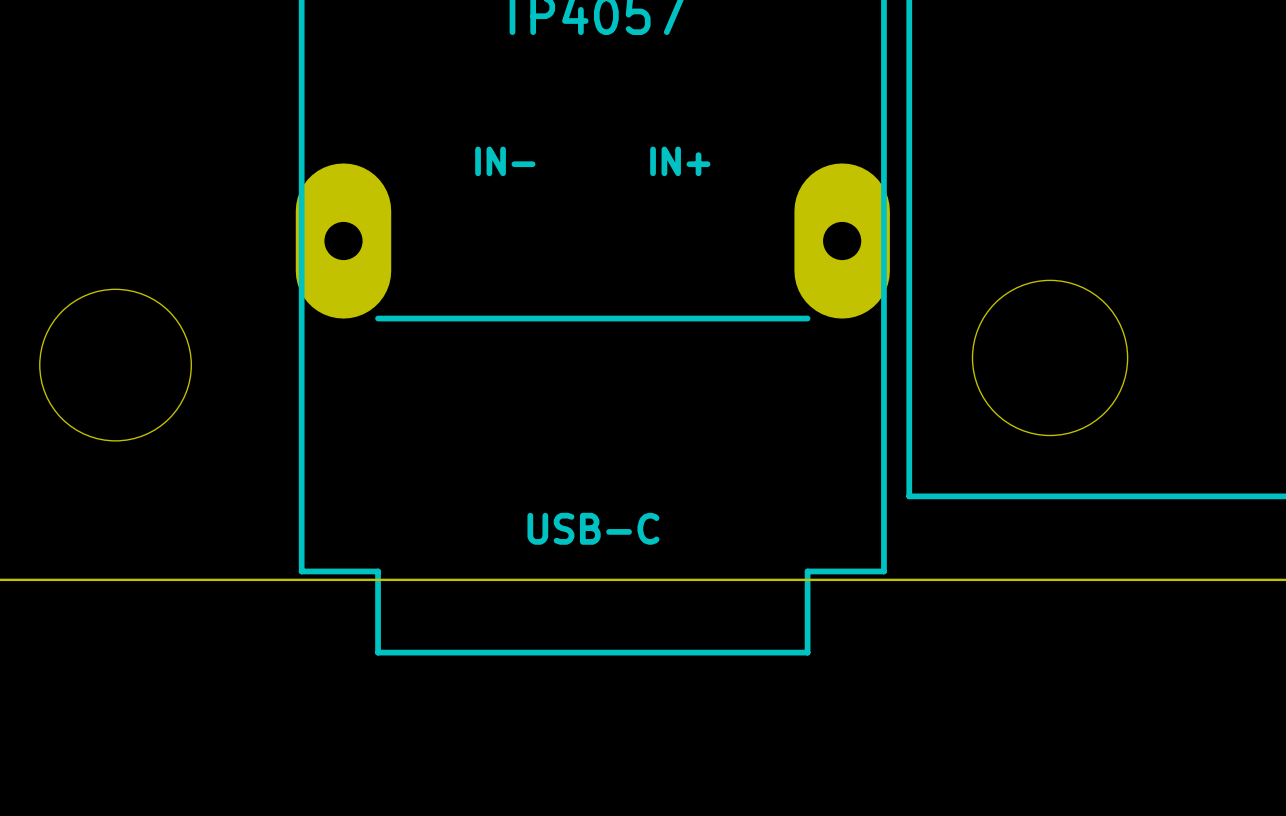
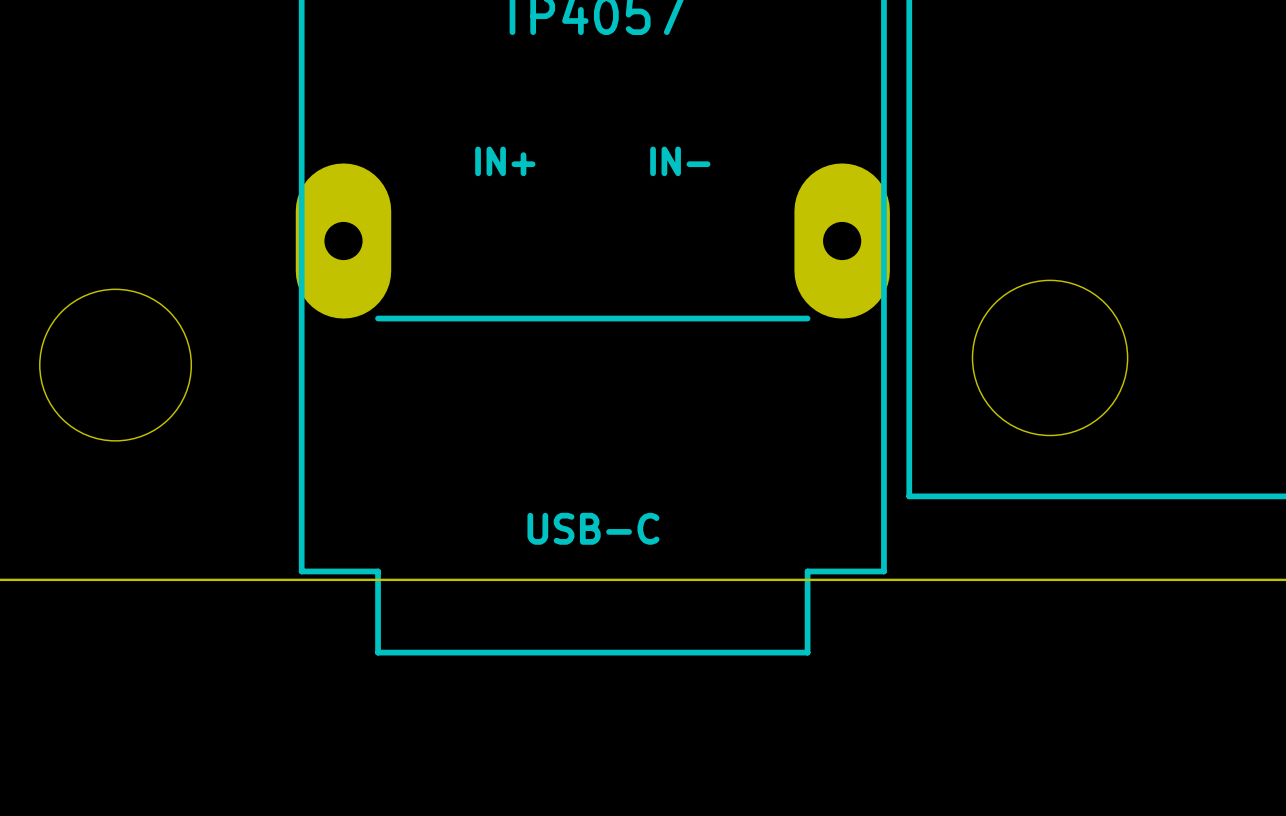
part text: IN- IN+ (592, 161) -> IN+ IN- (592, 161)

